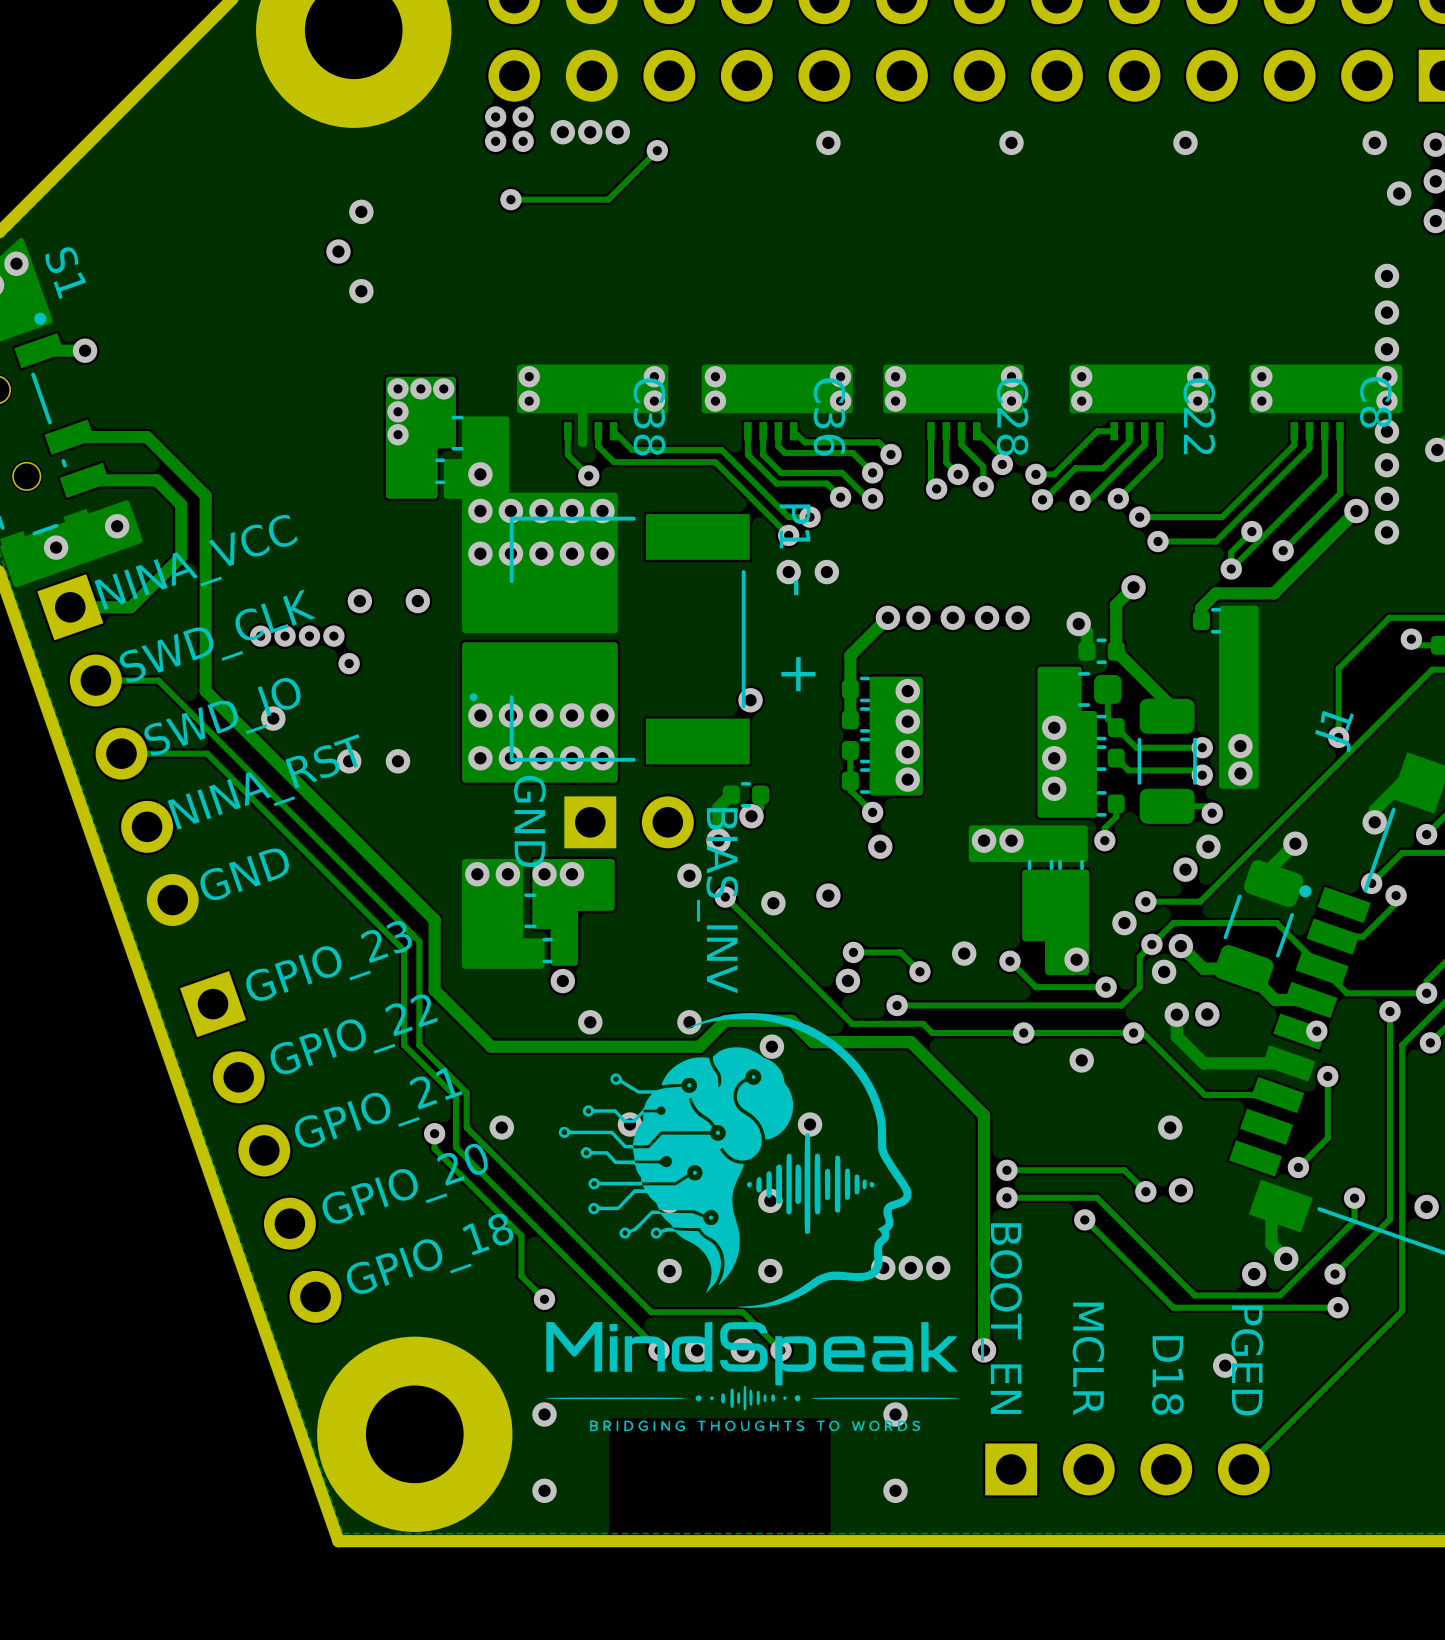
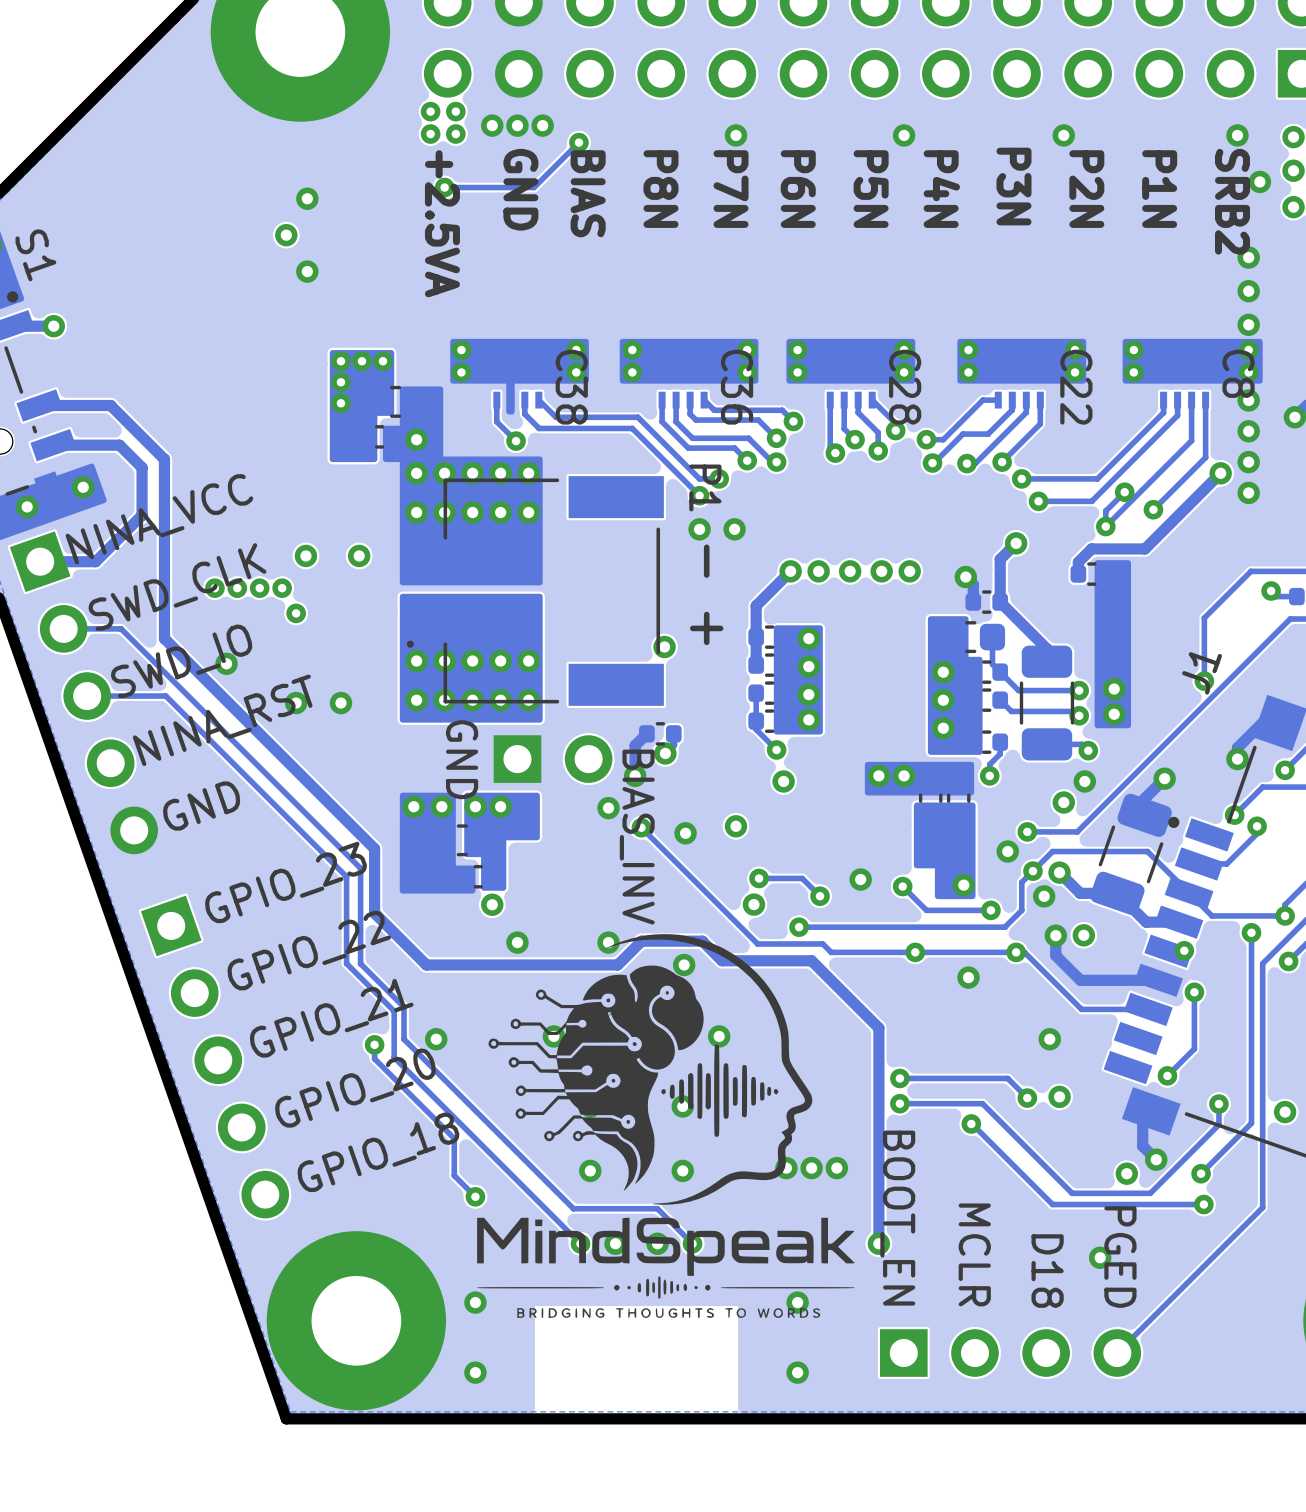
text: none -> P3N (1013, 186)
text: none -> P8N (660, 189)
text: none -> P7N (731, 189)
text: none -> P6N (798, 189)
text: none -> P5N (871, 189)
text: none -> P4N (941, 189)
text: none -> P2N (1086, 189)
text: none -> P1N (1159, 189)
text: none -> GND (520, 189)
text: none -> BIAS (588, 193)
text: none -> SRB2 (1232, 201)
text: none -> +2.5VA (442, 223)

